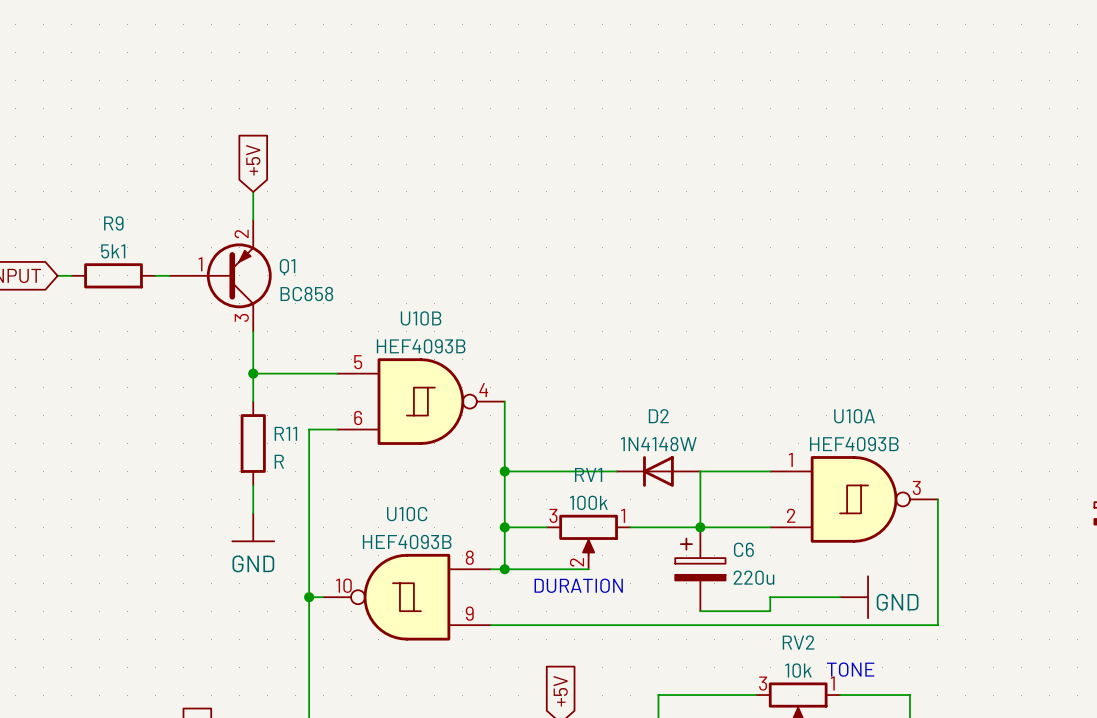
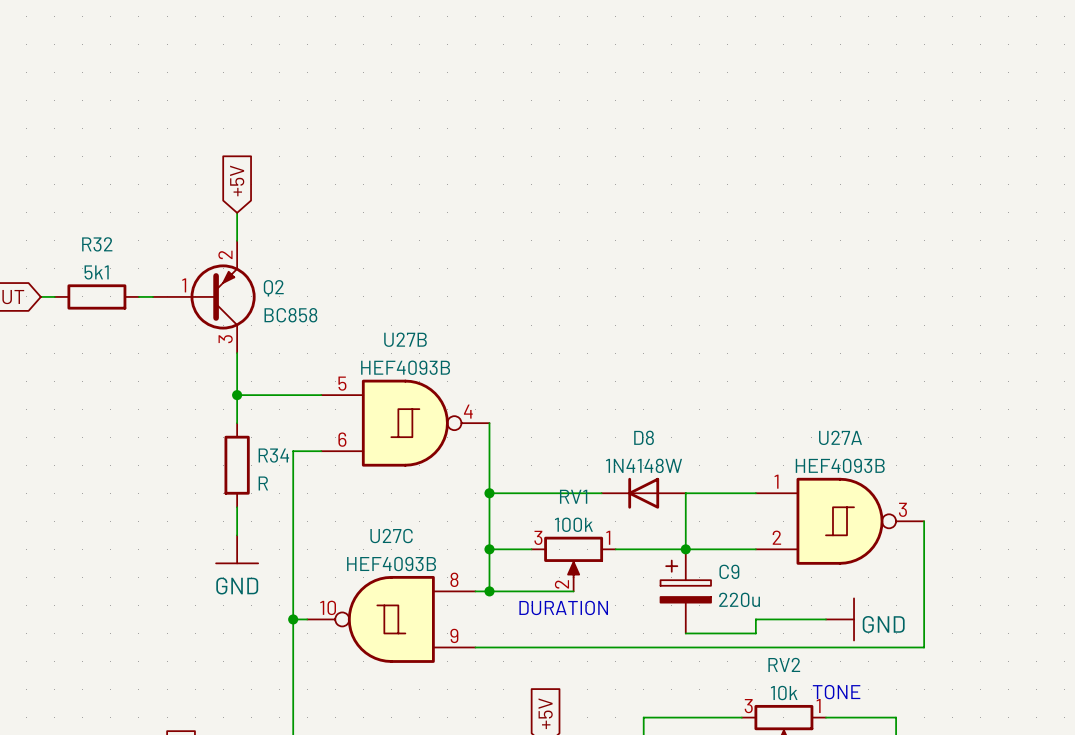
R9 name: R9 (113, 223) -> R32 (97, 244)
Q1 name: Q1 (287, 267) -> Q2 (273, 288)
U10B name: U10B (421, 318) -> U27B (405, 339)
D2 name: D2 (658, 416) -> D8 (644, 437)
U10A name: U10A (854, 416) -> U27A (840, 437)
R11 name: R11 (285, 433) -> R34 (273, 455)
U10C name: U10C (407, 514) -> U27C (391, 536)
C6 name: C6 (743, 549) -> C9 (729, 571)

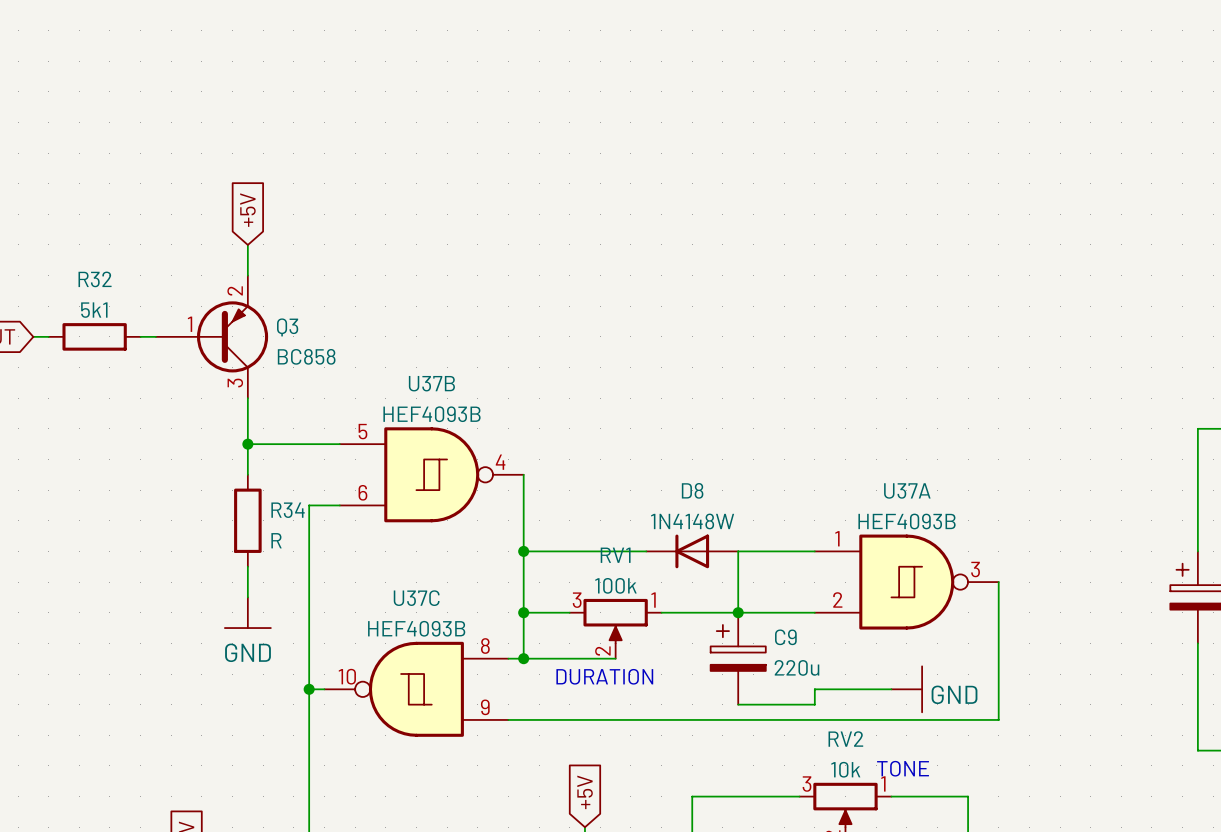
Q2 name: Q2 (273, 288) -> Q3 (287, 327)
U27B name: U27B (405, 339) -> U37B (431, 383)
U27A name: U27A (840, 437) -> U37A (907, 490)
U27C name: U27C (391, 536) -> U37C (416, 598)

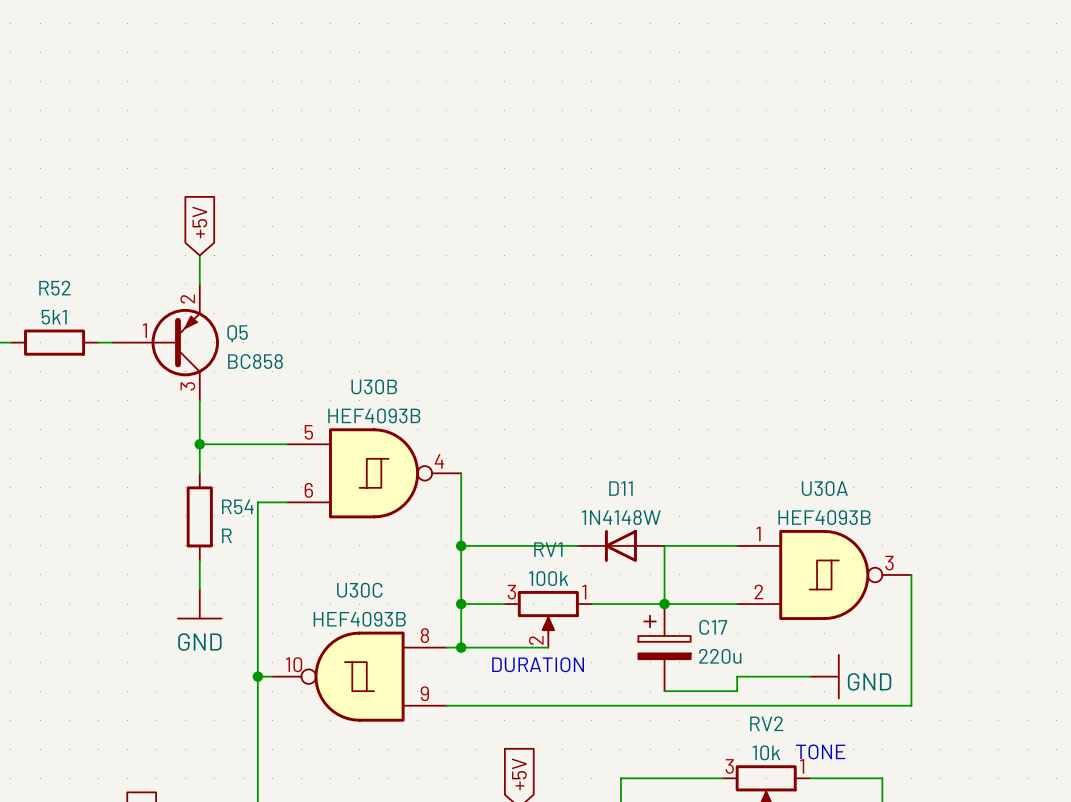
R32 name: R32 (95, 279) -> R52 (54, 288)
Q3 name: Q3 (287, 327) -> Q5 (237, 333)
U37B name: U37B (431, 383) -> U30B (374, 386)
D8 name: D8 (692, 490) -> D11 (620, 488)
U37A name: U37A (907, 490) -> U30A (824, 488)
R34 name: R34 (288, 510) -> R54 (237, 506)
U37C name: U37C (416, 598) -> U30C (359, 590)
C9 name: C9 (785, 637) -> C17 (713, 627)

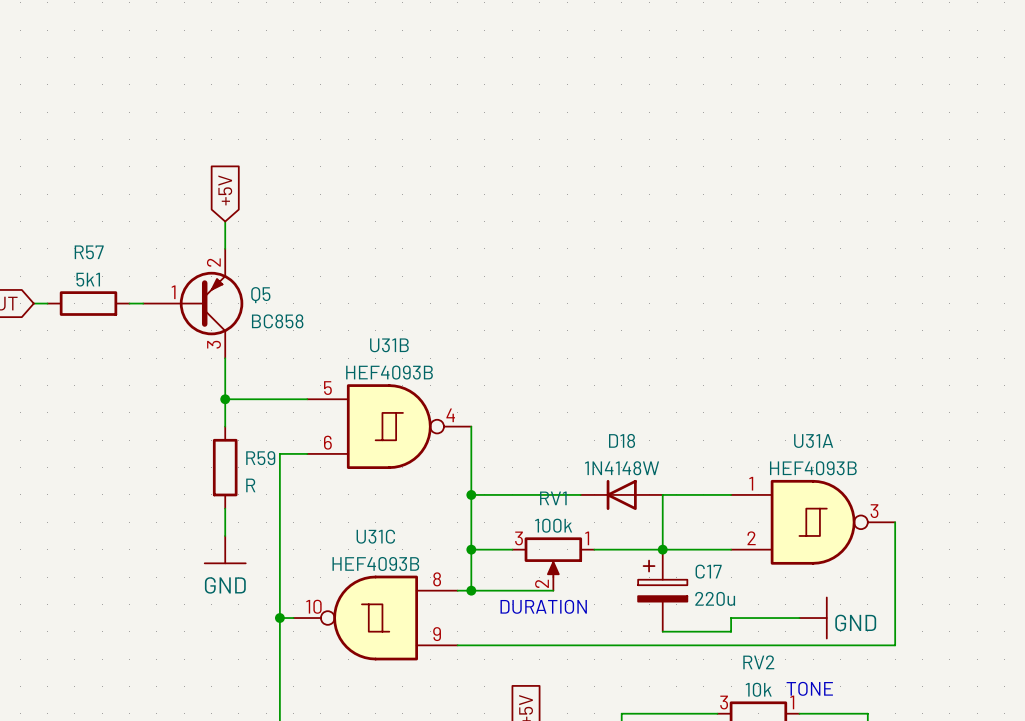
R52 name: R52 (54, 288) -> R57 (89, 252)
U30B name: U30B (374, 386) -> U31B (389, 345)
D11 name: D11 (620, 488) -> D18 (622, 440)
U30A name: U30A (824, 488) -> U31A (813, 441)
R54 name: R54 (237, 506) -> R59 (260, 458)
U30C name: U30C (359, 590) -> U31C (375, 536)

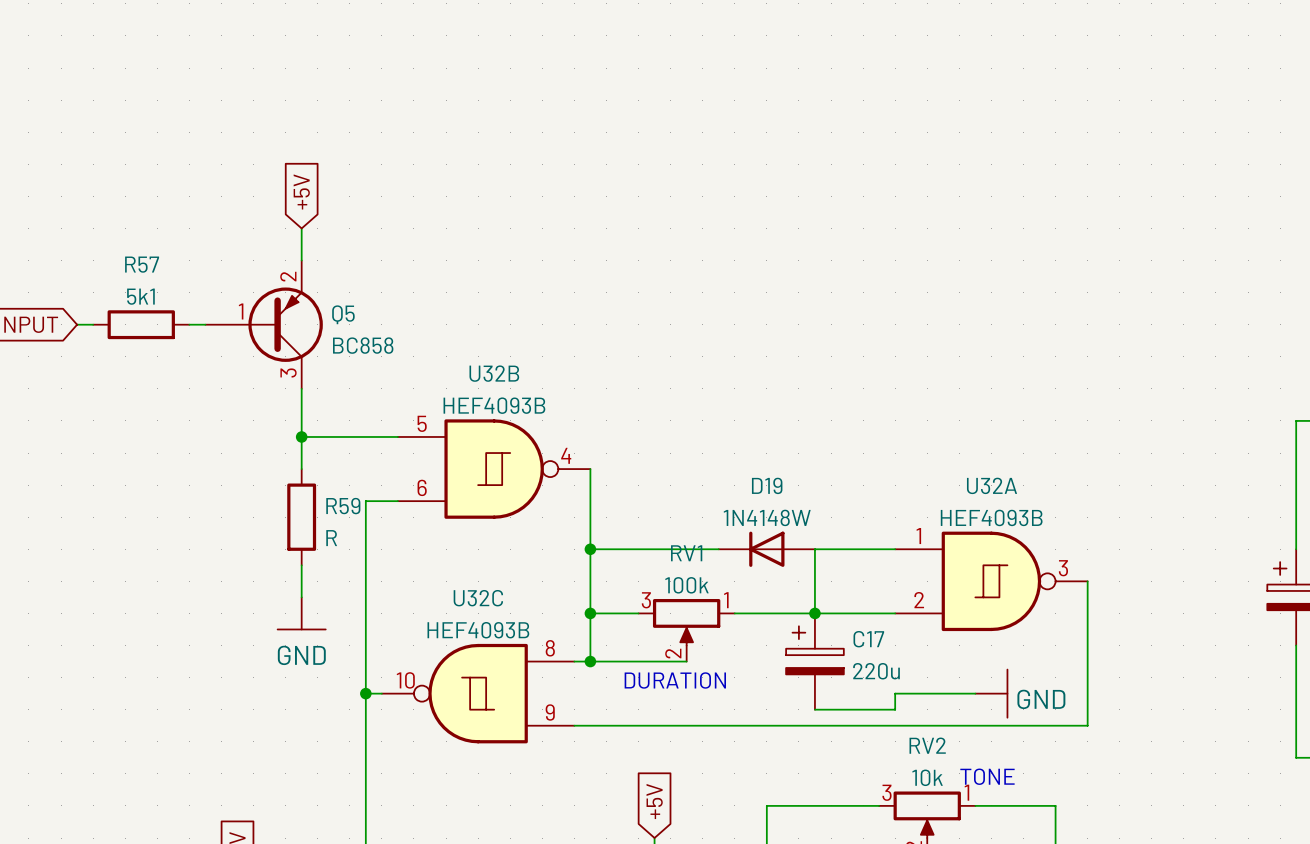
U31B name: U31B (389, 345) -> U32B (494, 373)
D18 name: D18 (622, 440) -> D19 (767, 485)
U31A name: U31A (813, 441) -> U32A (991, 485)
U31C name: U31C (375, 536) -> U32C (478, 598)

